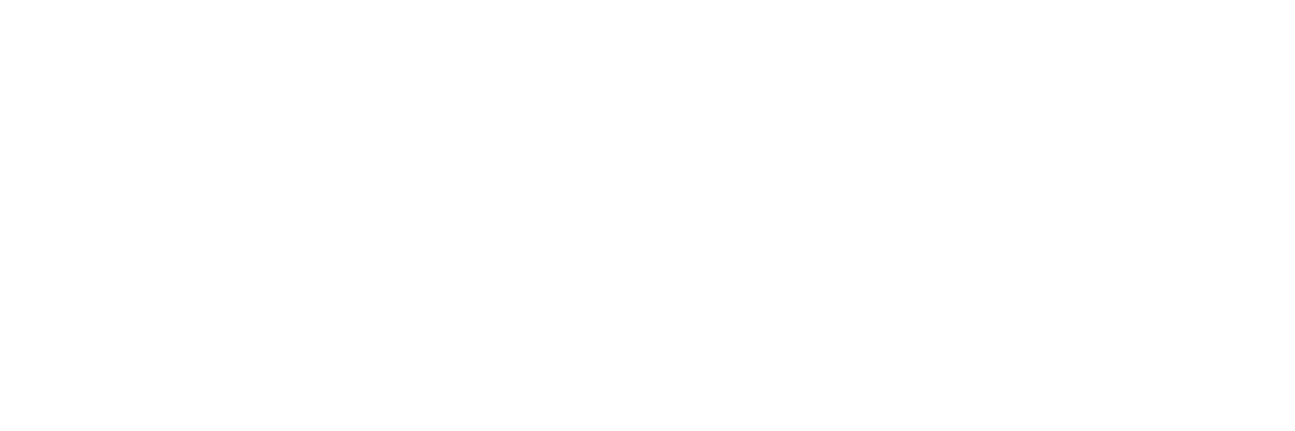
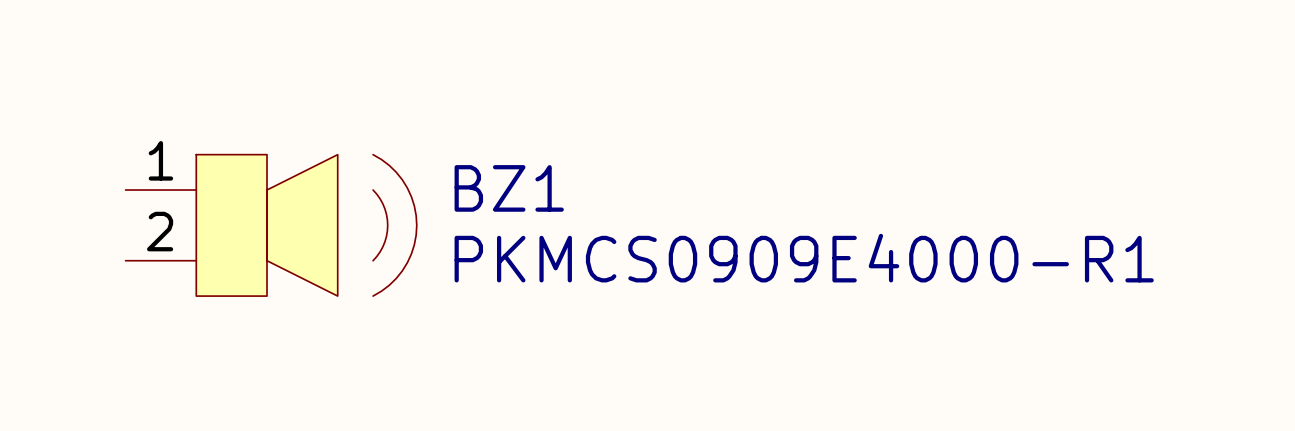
BZ1: none -> PKMCS0909E4000-R1 (271, 225)

